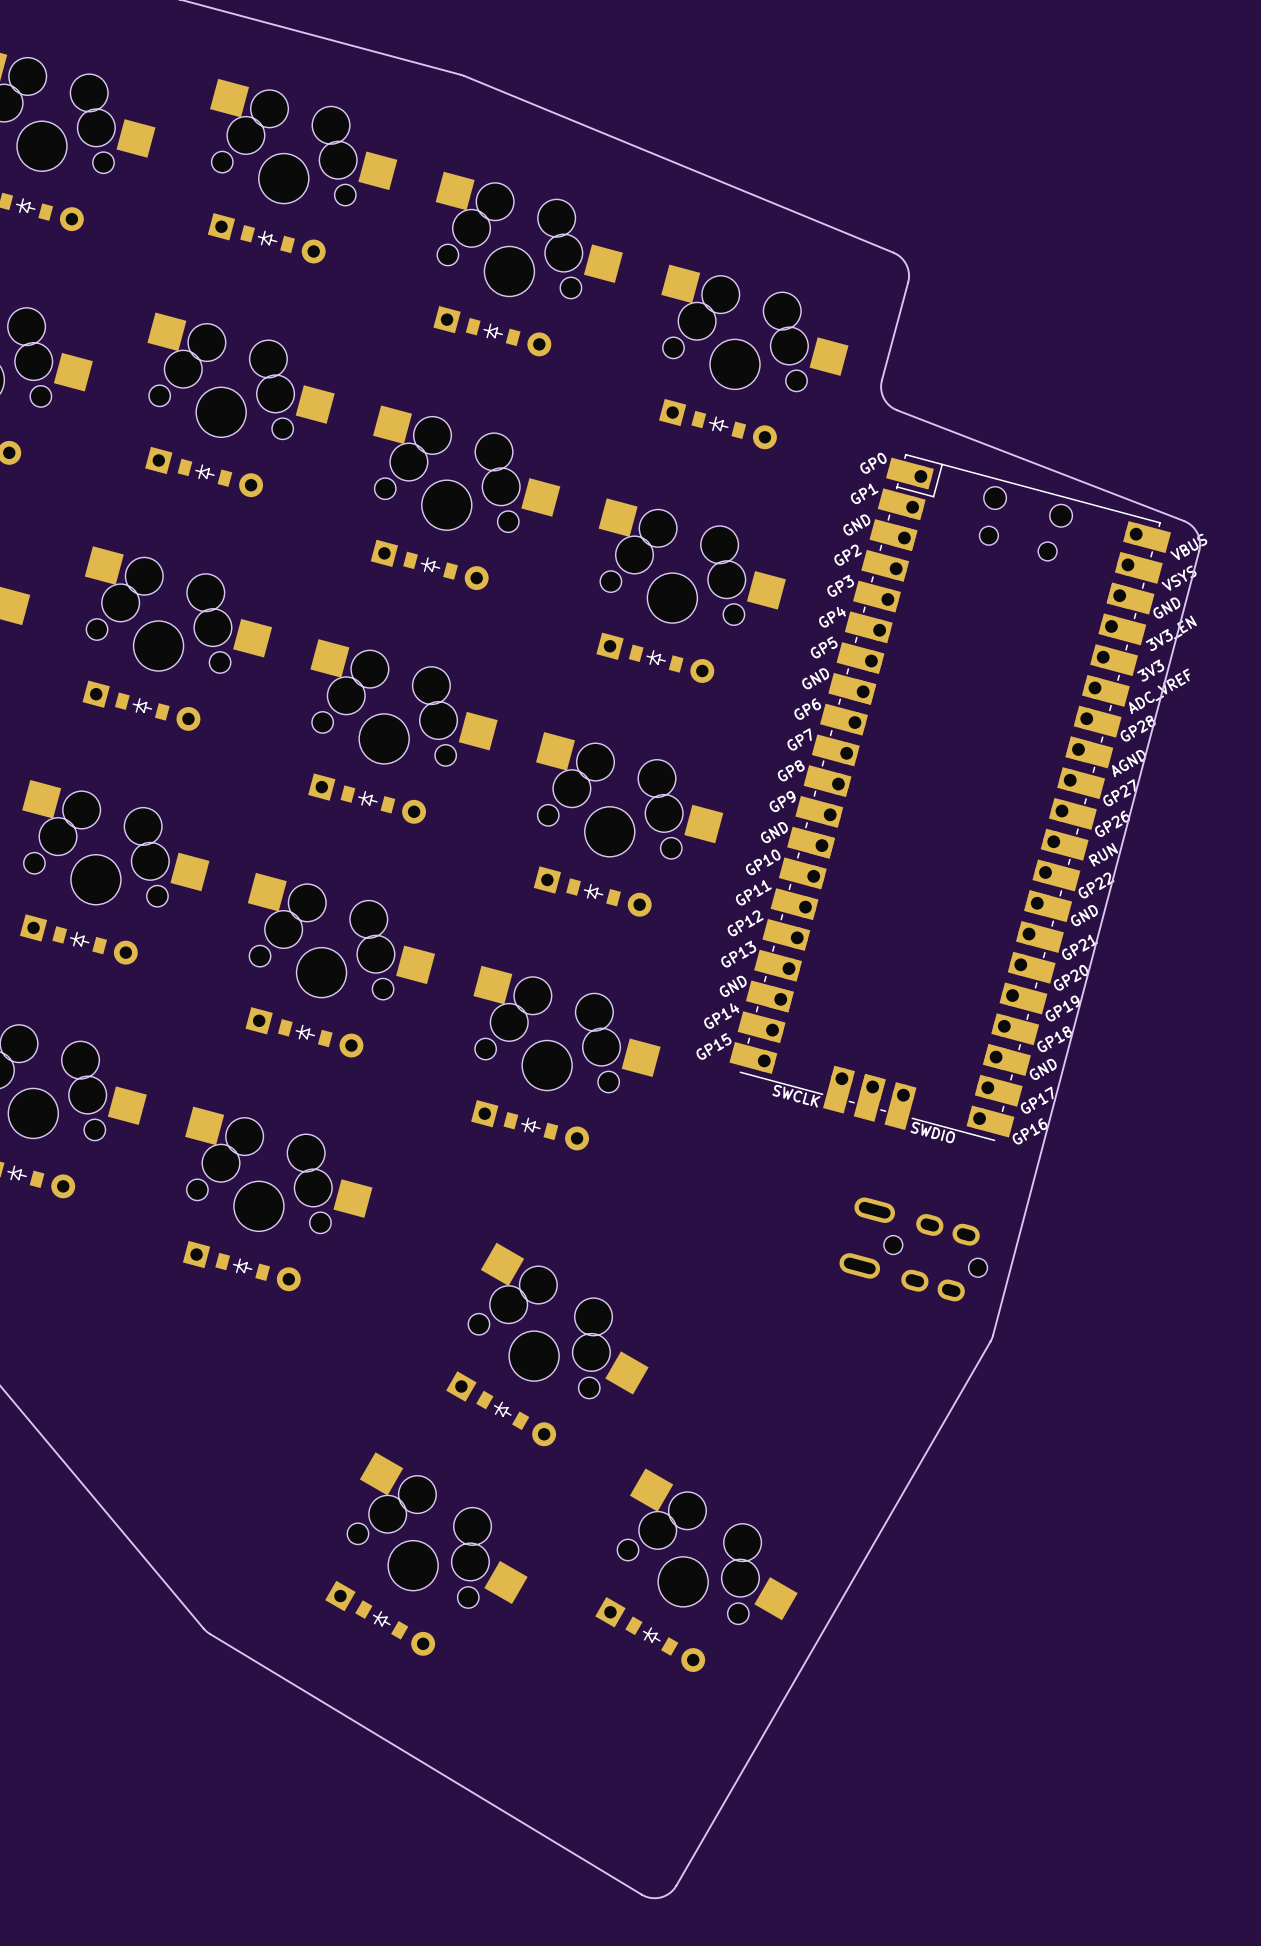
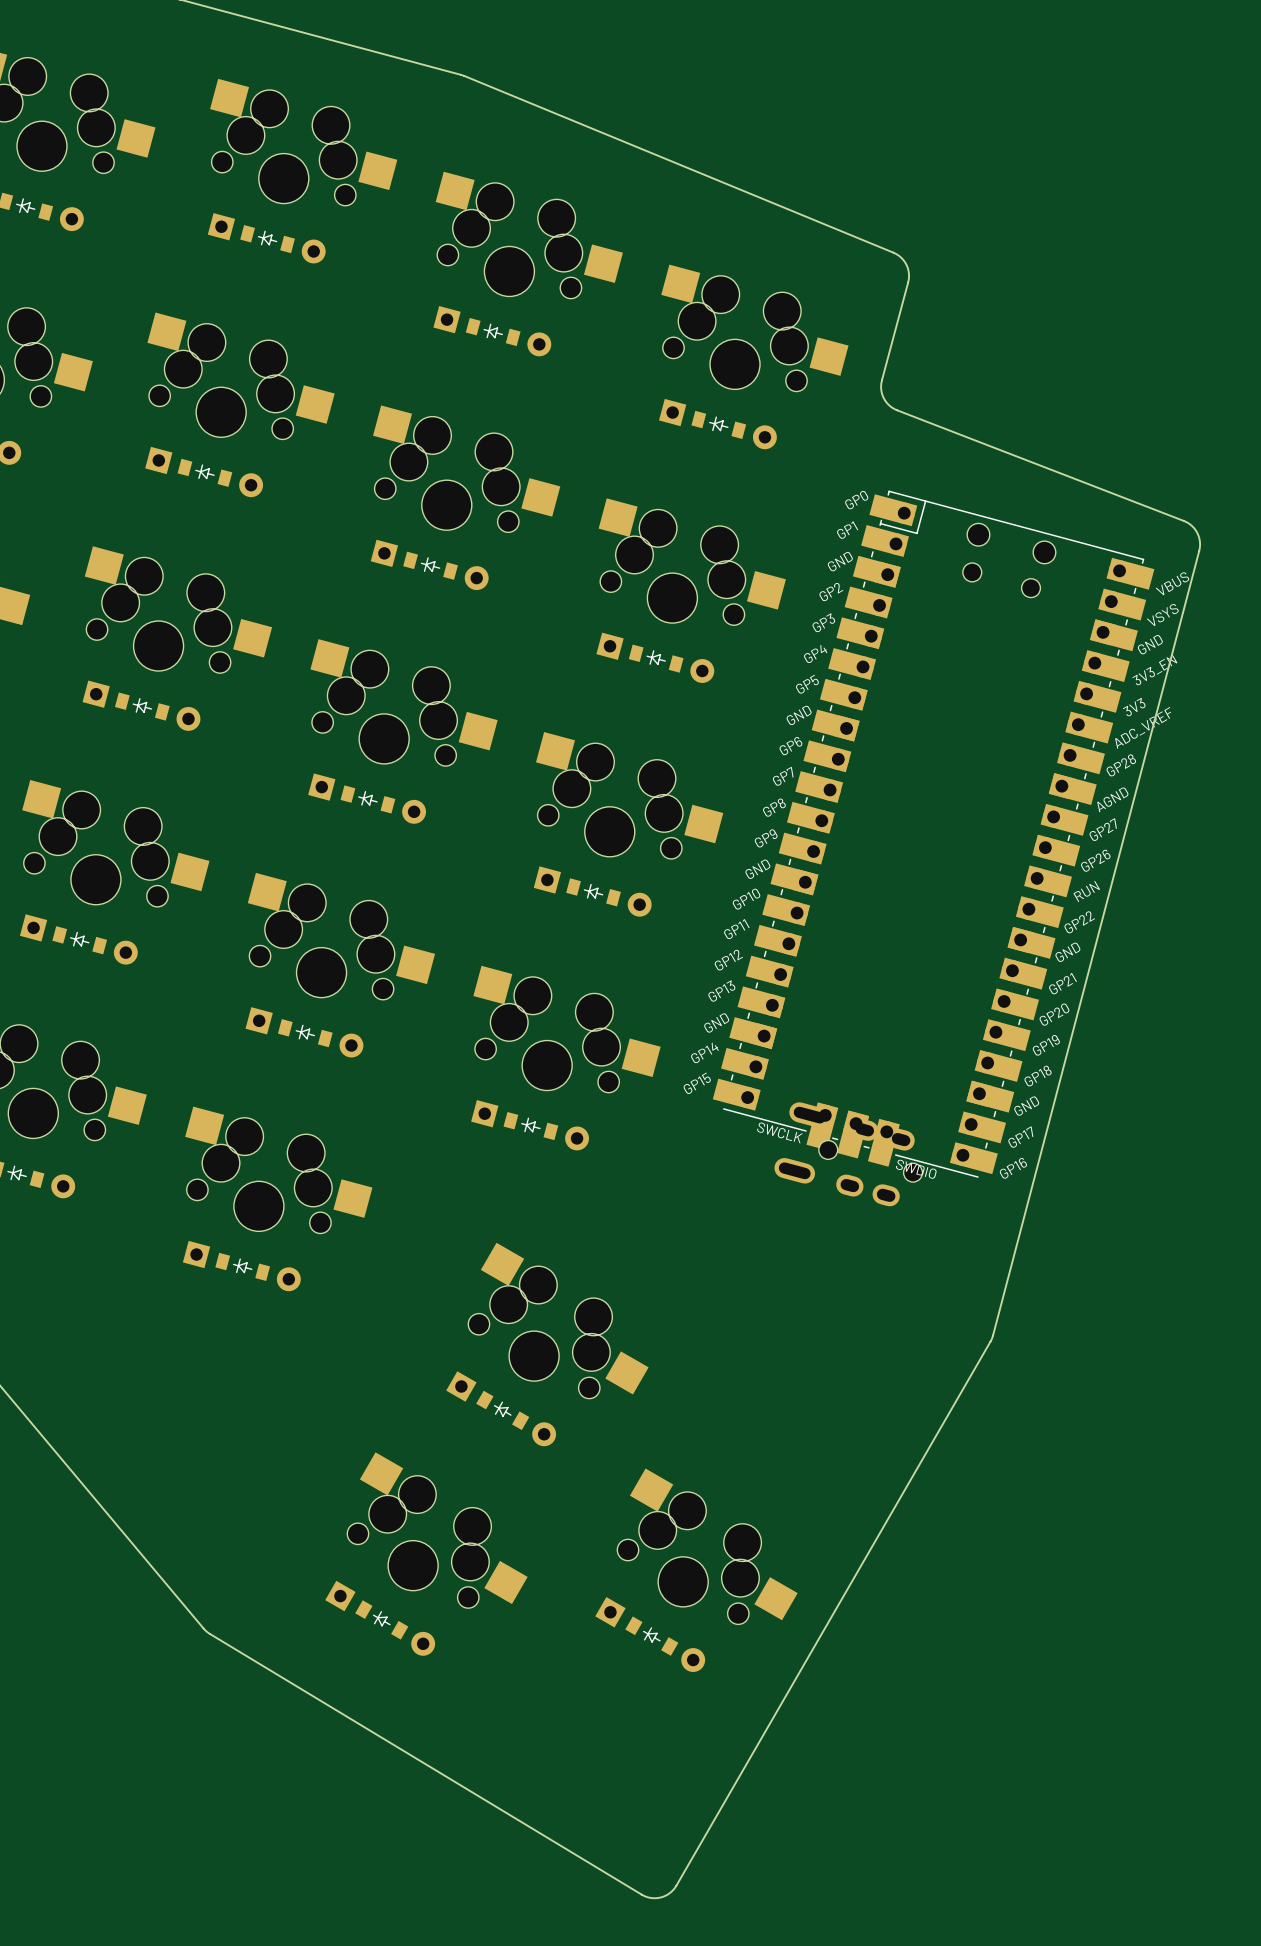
part position: (950, 797) -> (933, 834)
part position: (913, 1249) -> (848, 1154)

